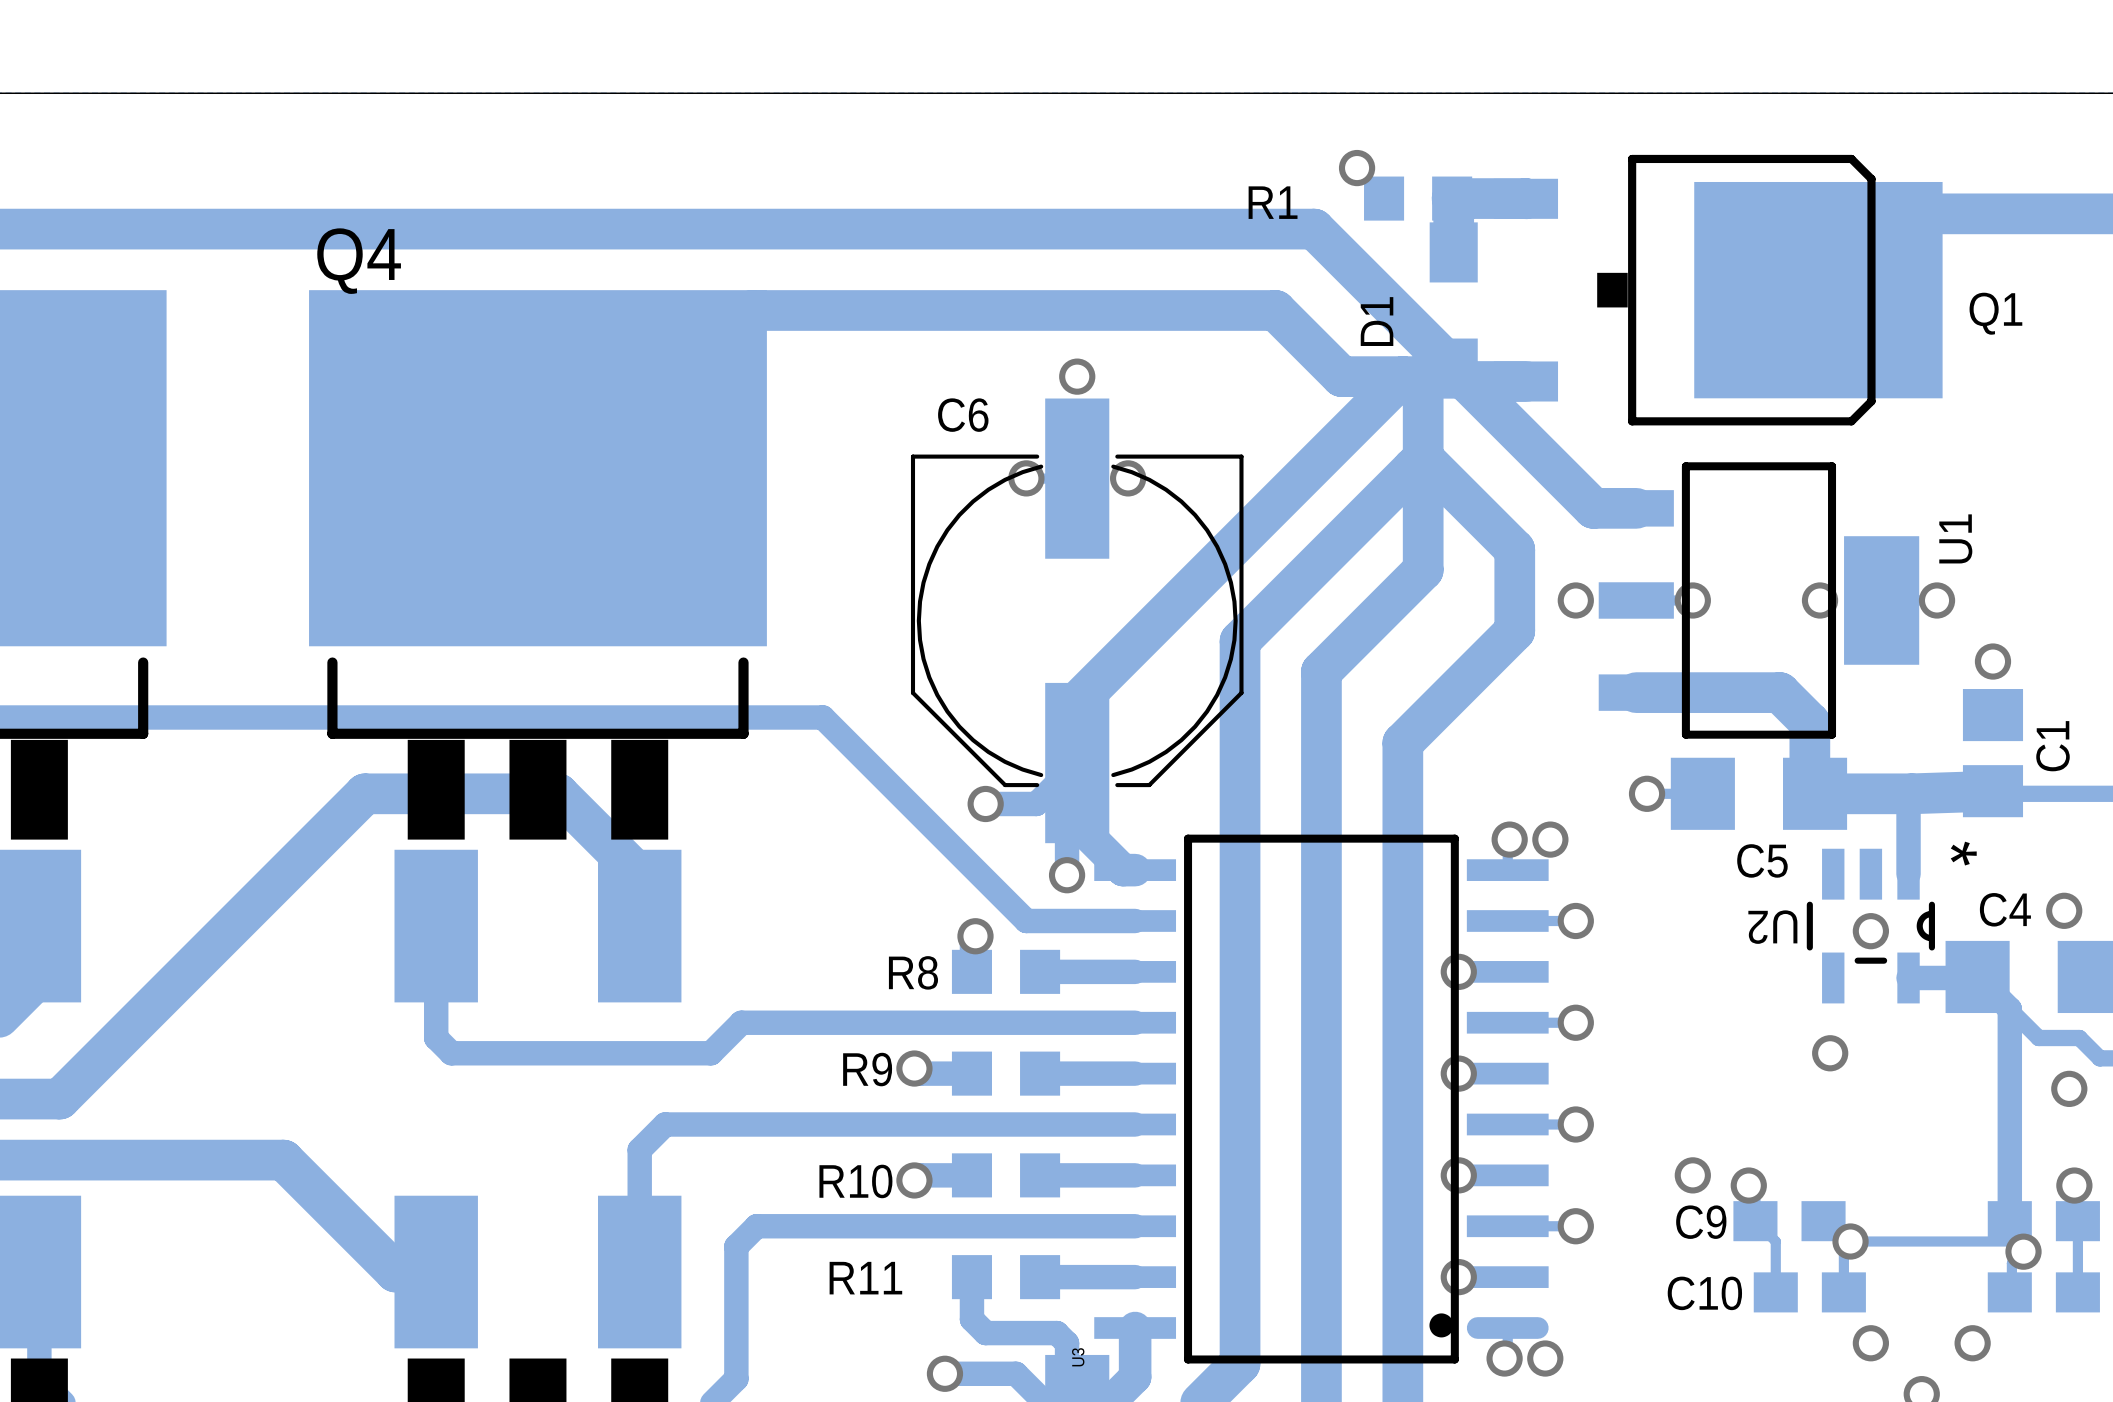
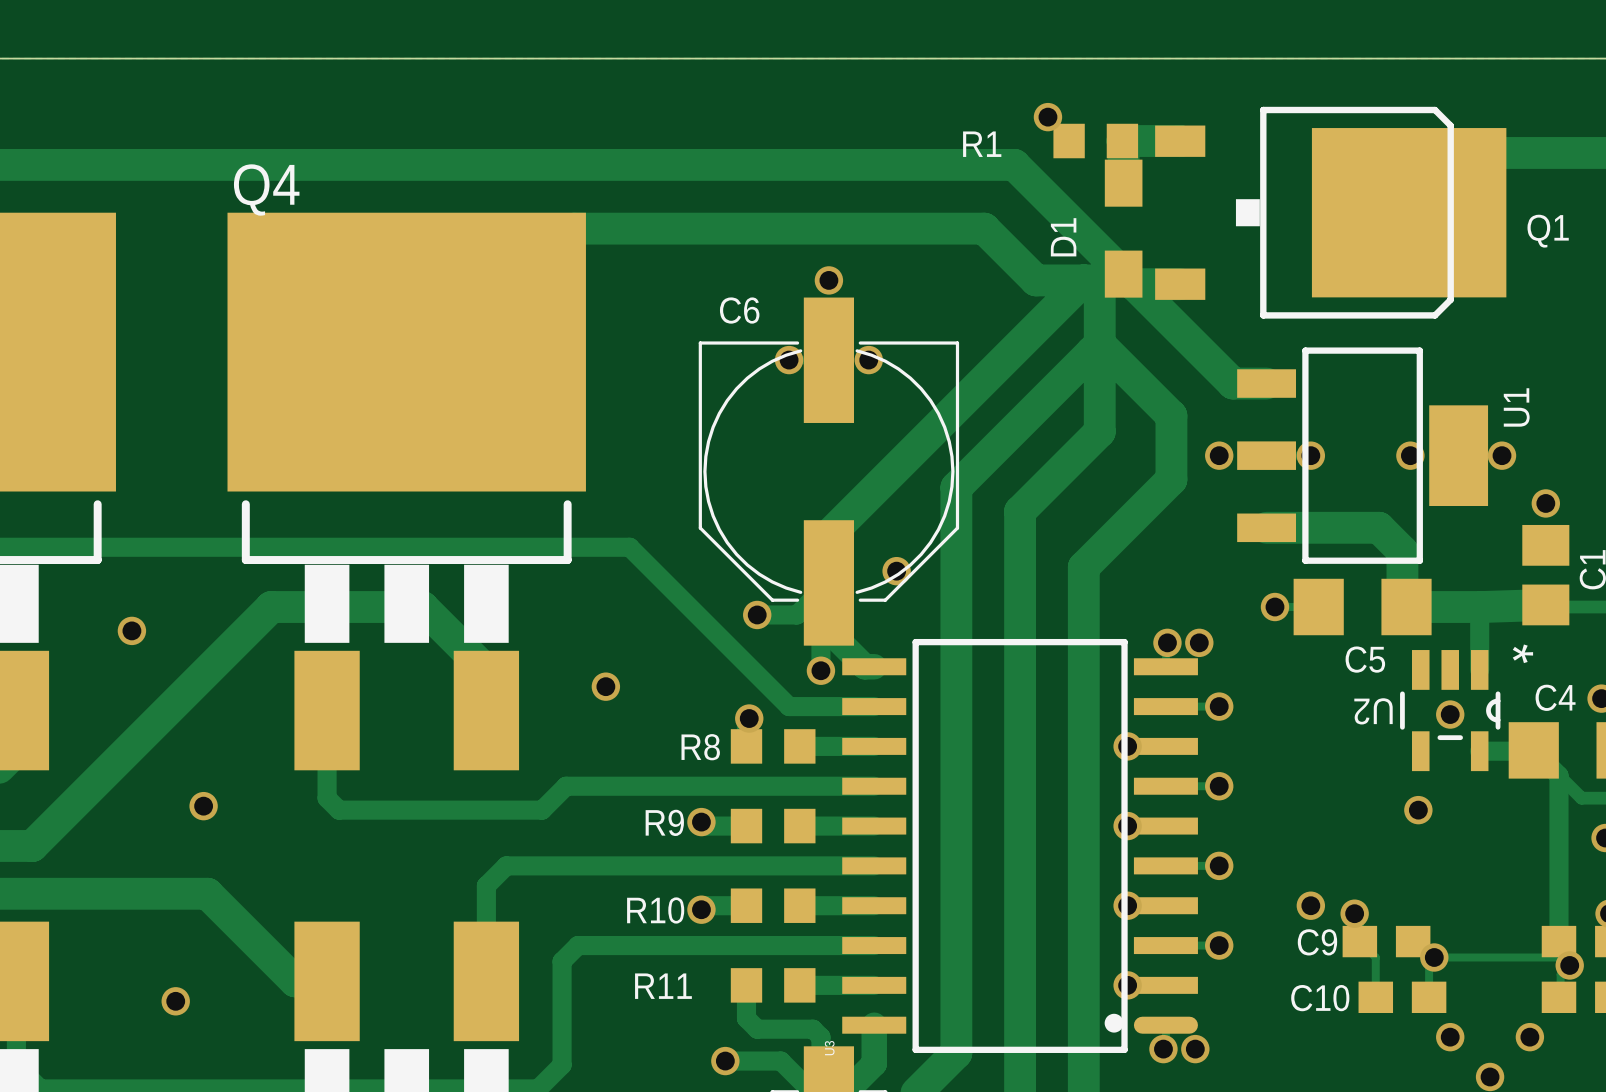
via: none -> (896, 571)
via: none -> (131, 630)
via: none -> (605, 686)
via: none -> (203, 806)
via: none -> (175, 1001)

